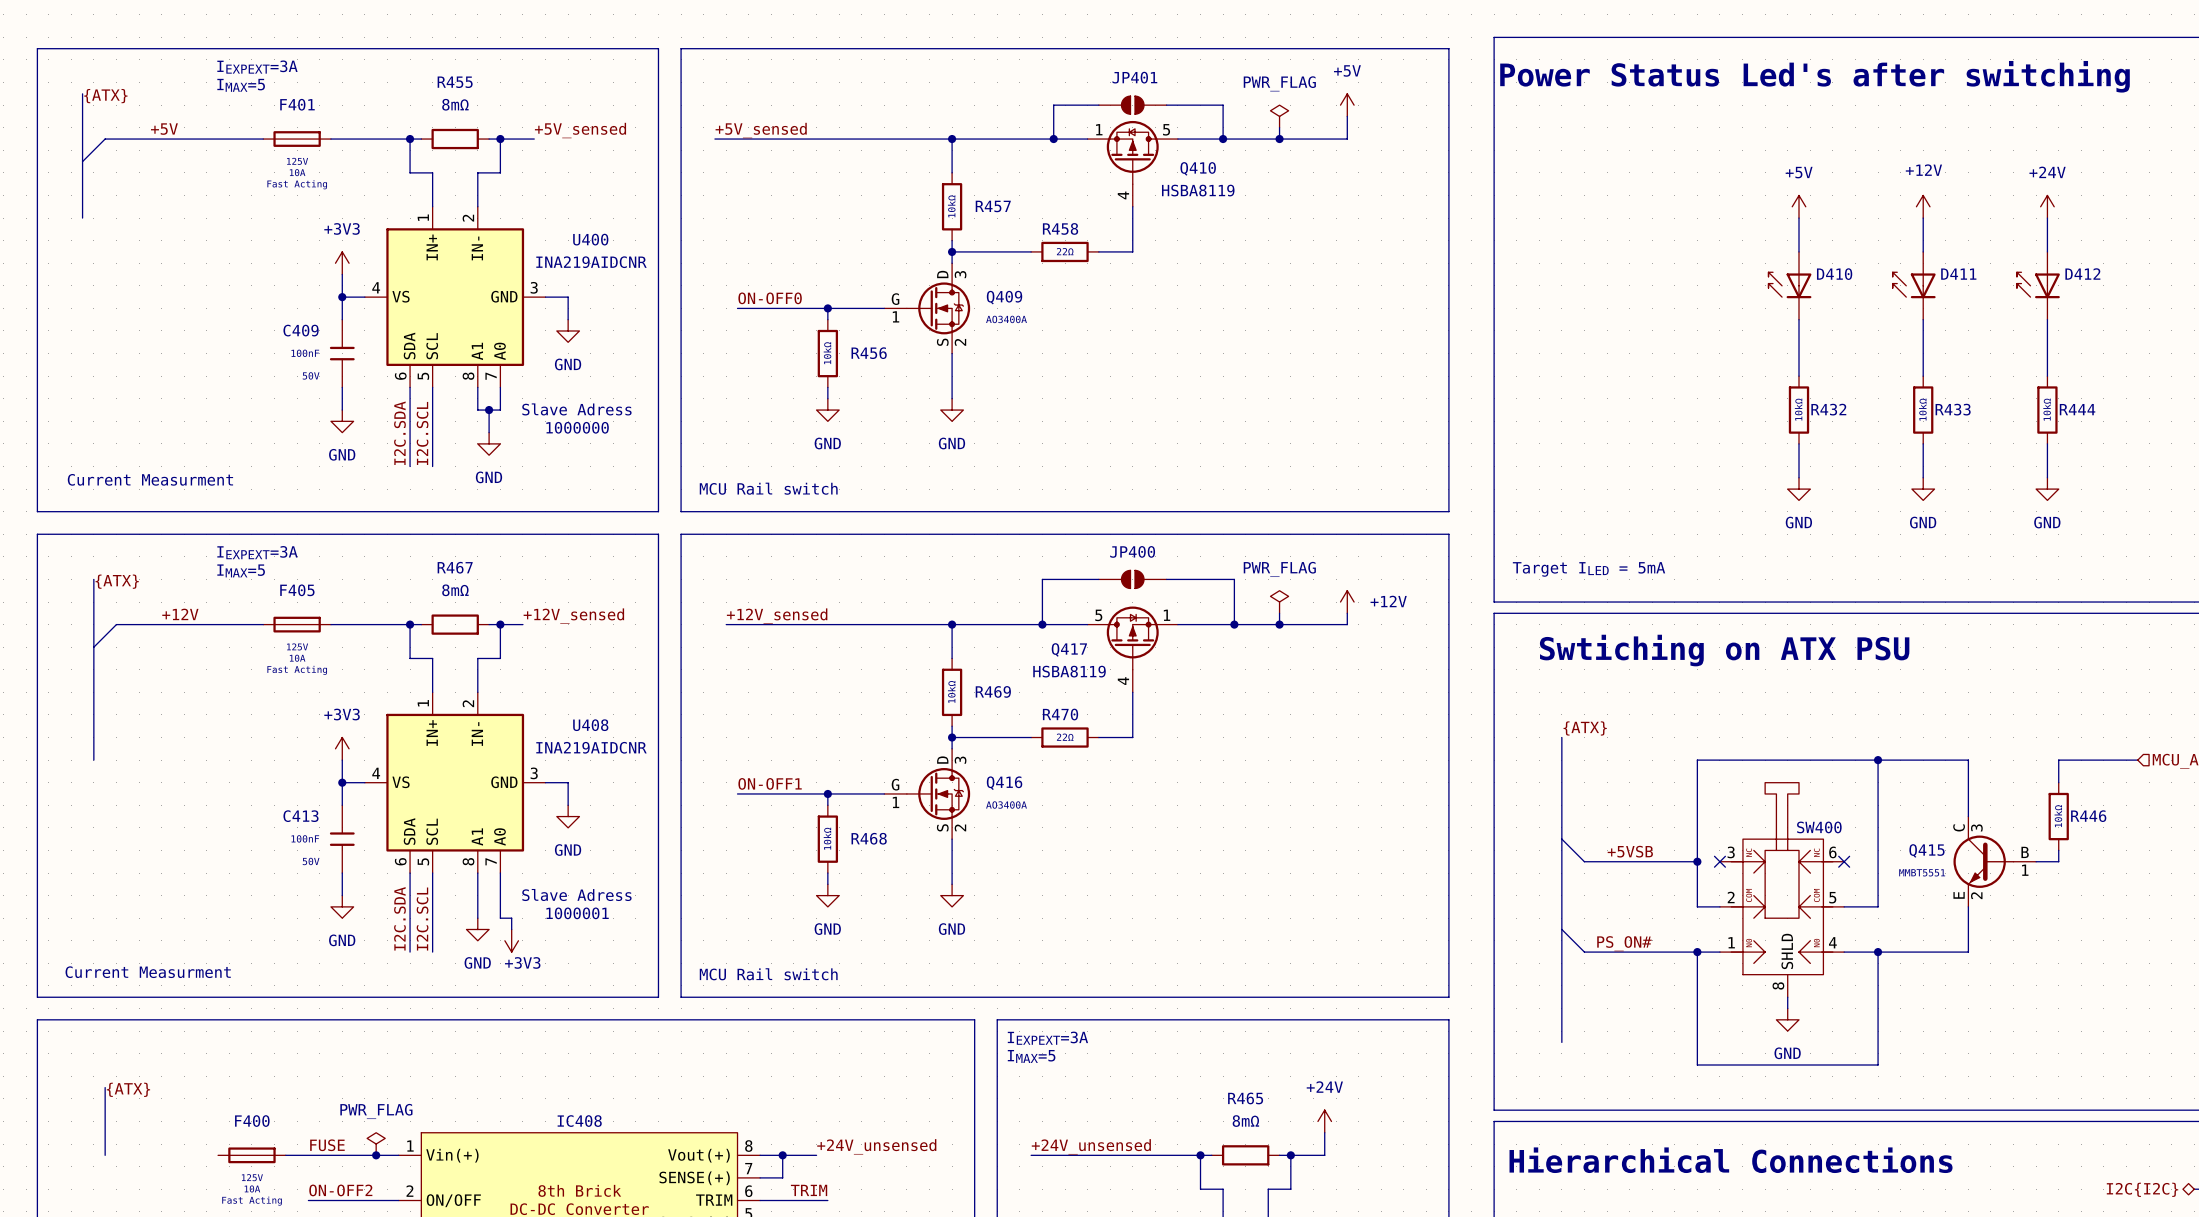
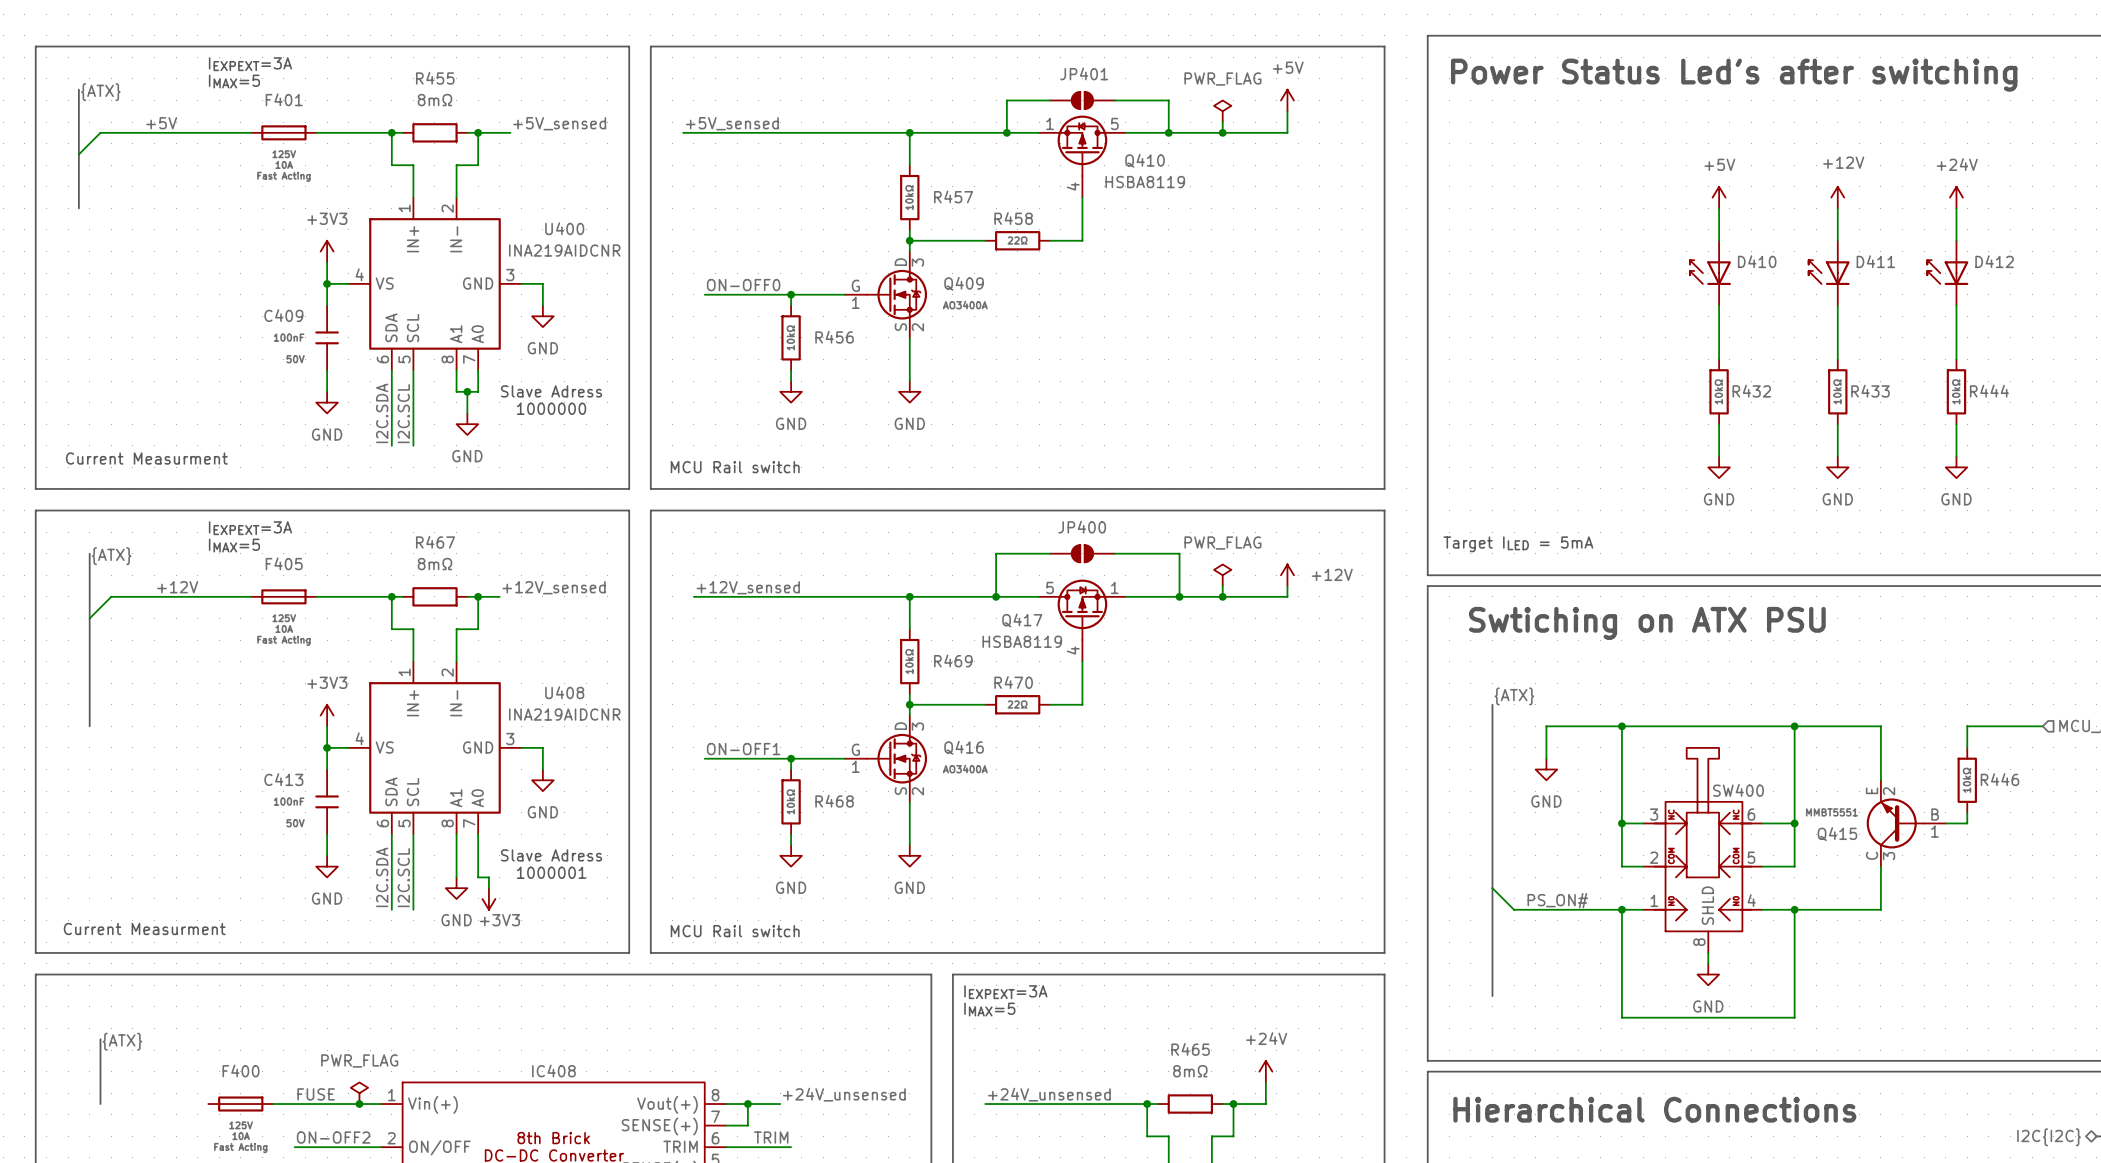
wire: none -> (1621, 726) (1546, 726) (1546, 758)
junction: none -> (1621, 726)
power symbol: none -> GND (1546, 769)
wire: (1561, 839) (1584, 861) (1697, 861) -> (1643, 823) (1621, 823)
label: +5VSB (1630, 851) -> none
no-connect mark: (1719, 861) -> none
wire: none -> (1762, 823) (1794, 823)
no-connect mark: (1844, 861) -> none
junction: none -> (1794, 823)
Q415 flip: as is (1983, 861) -> up-down (1895, 823)

